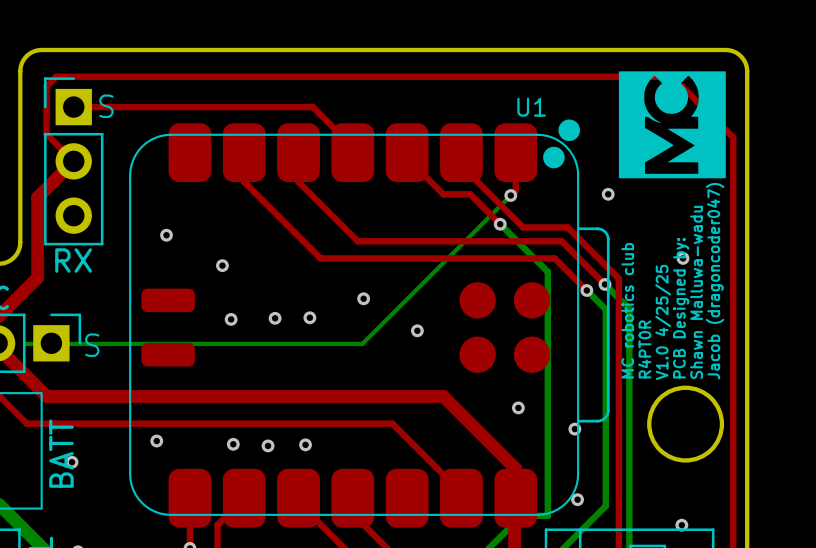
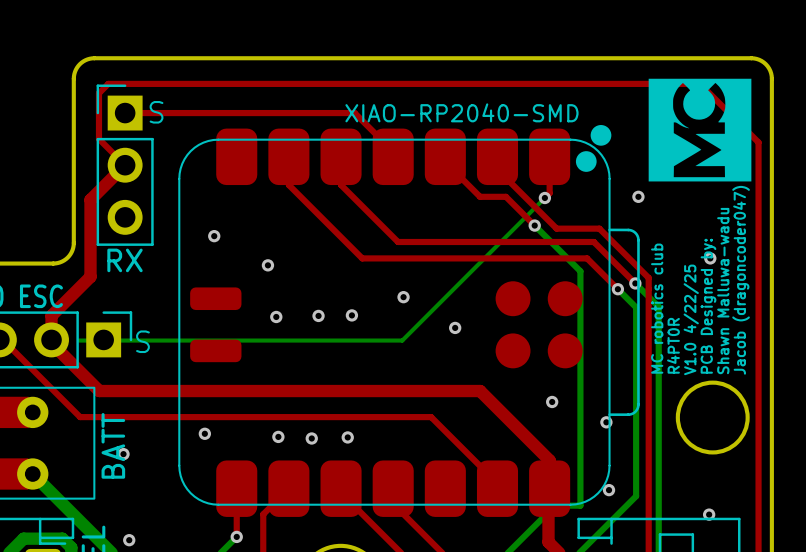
U1 name: U1 (531, 107) -> XIAO-RP2040-SMD (461, 112)
text: V1.0 4/25/25 (663, 322) -> V1.0 4/22/25 (691, 319)

